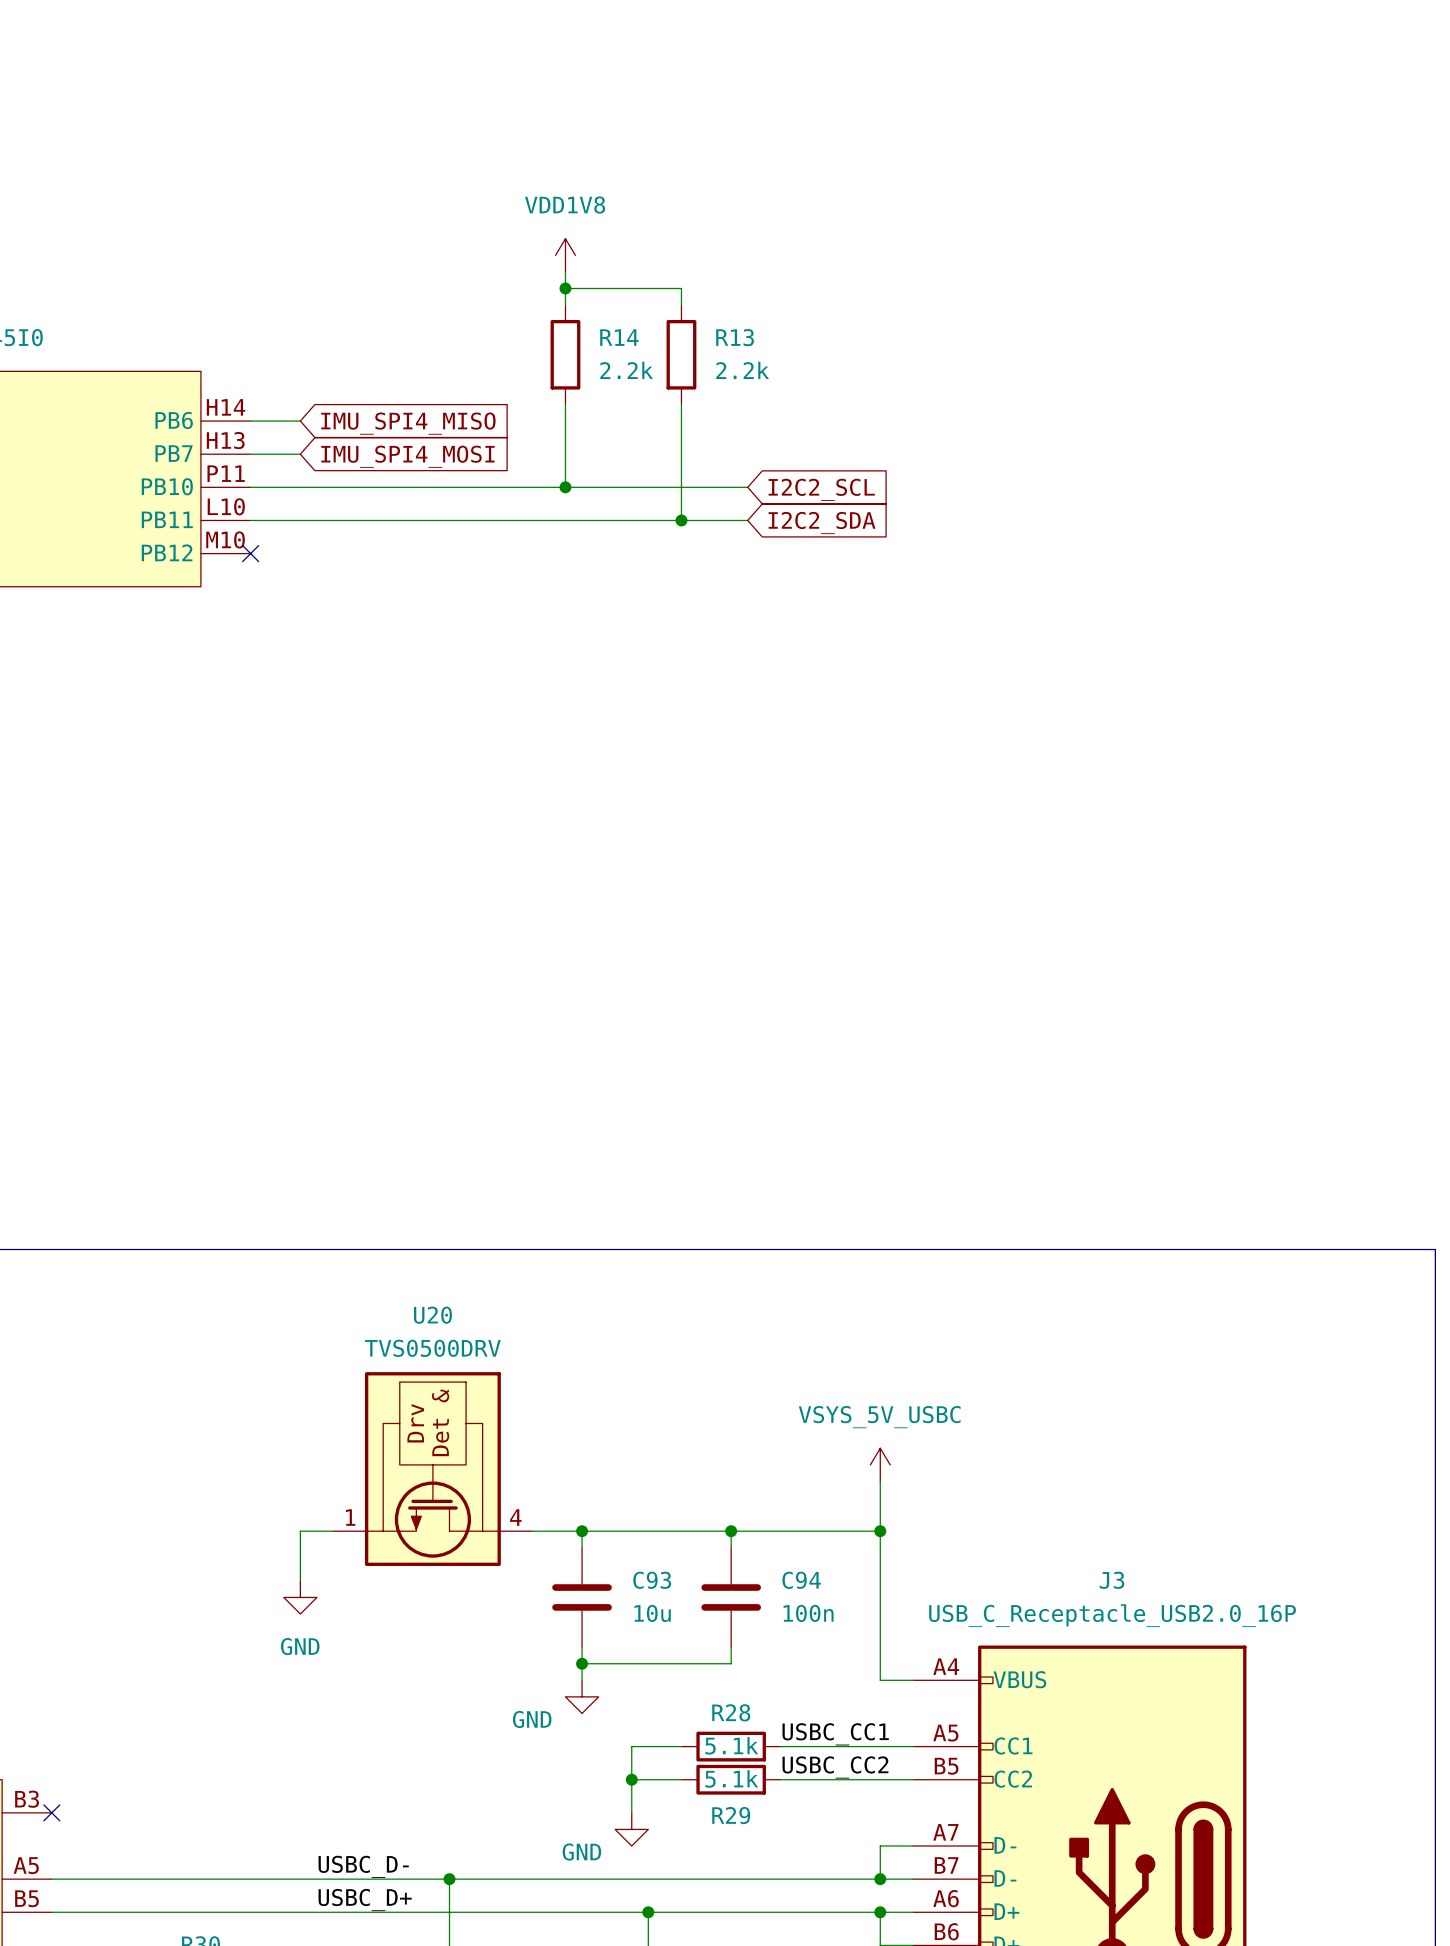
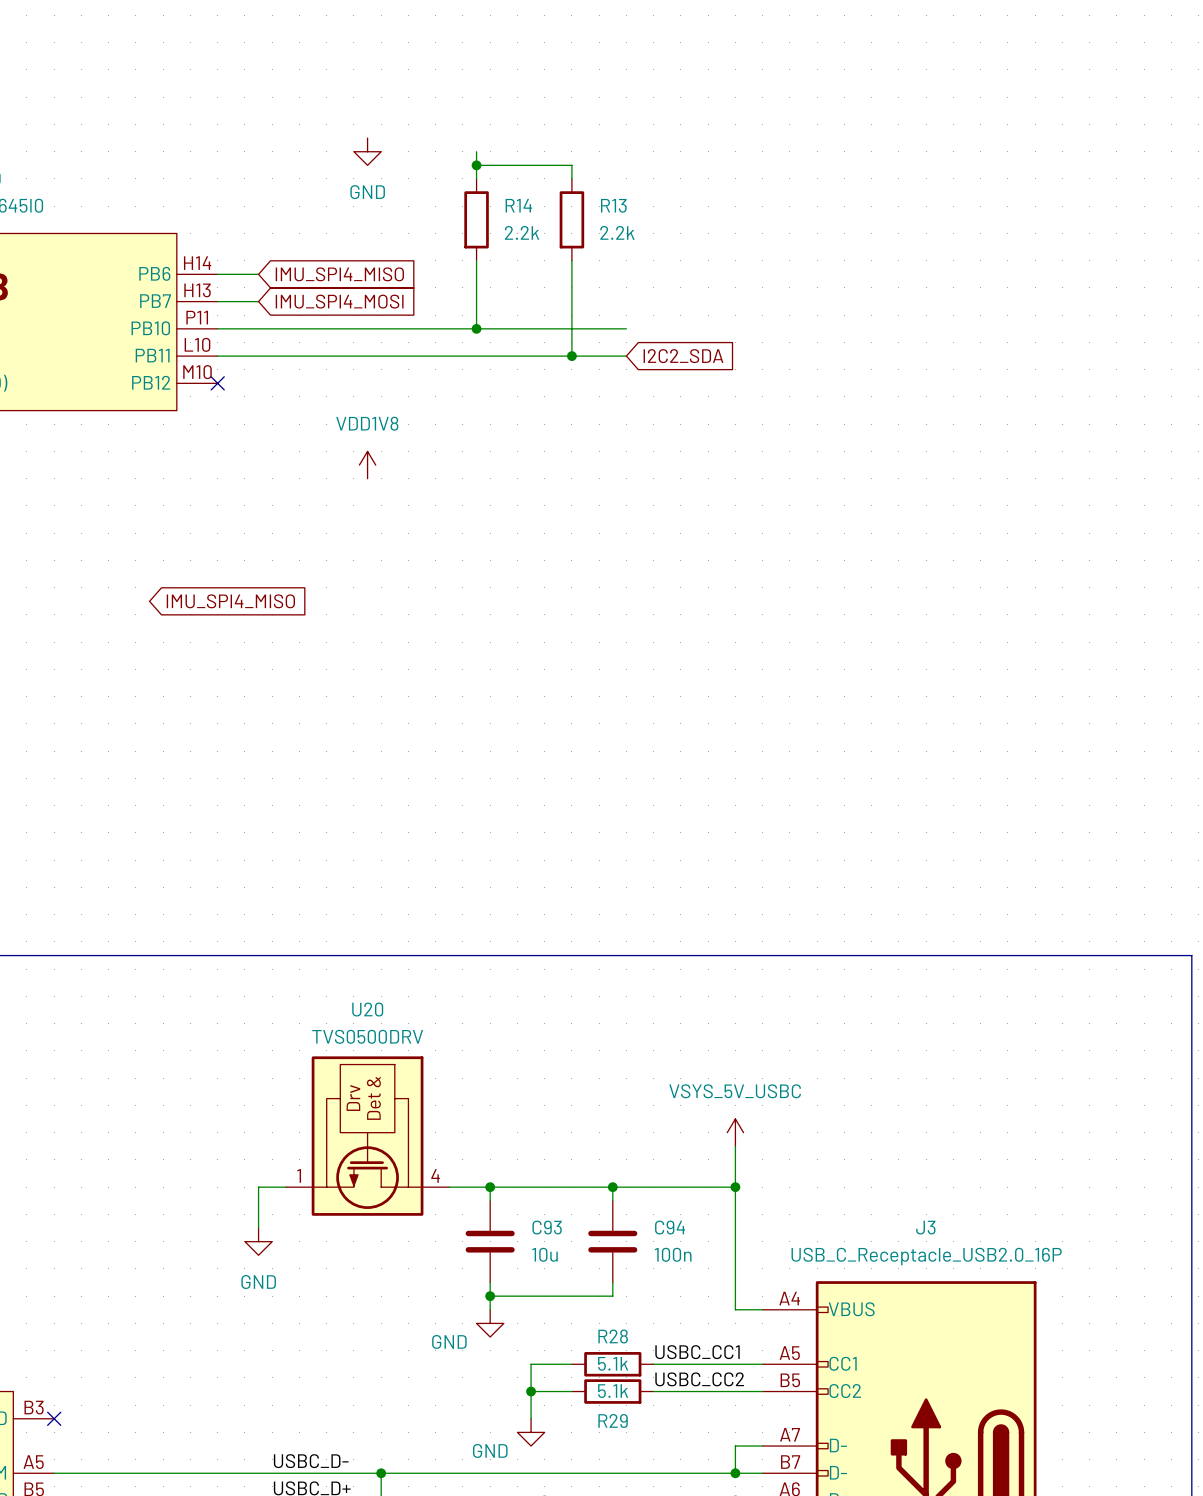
power symbol: VDD1V8 (565, 255) -> none
power symbol: none -> GND (367, 151)
global label: I2C2_SCL (821, 489) -> none
power symbol: none -> VDD1V8 (367, 465)
global label: none -> IMU_SPI4_MISO (230, 601)

